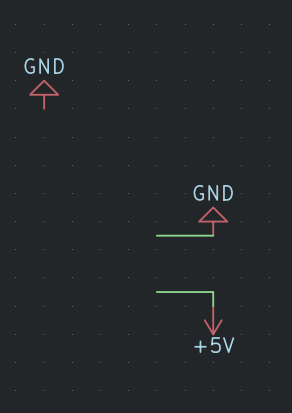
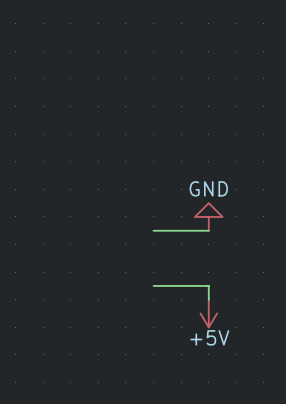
power symbol: GND (44, 94) -> none

